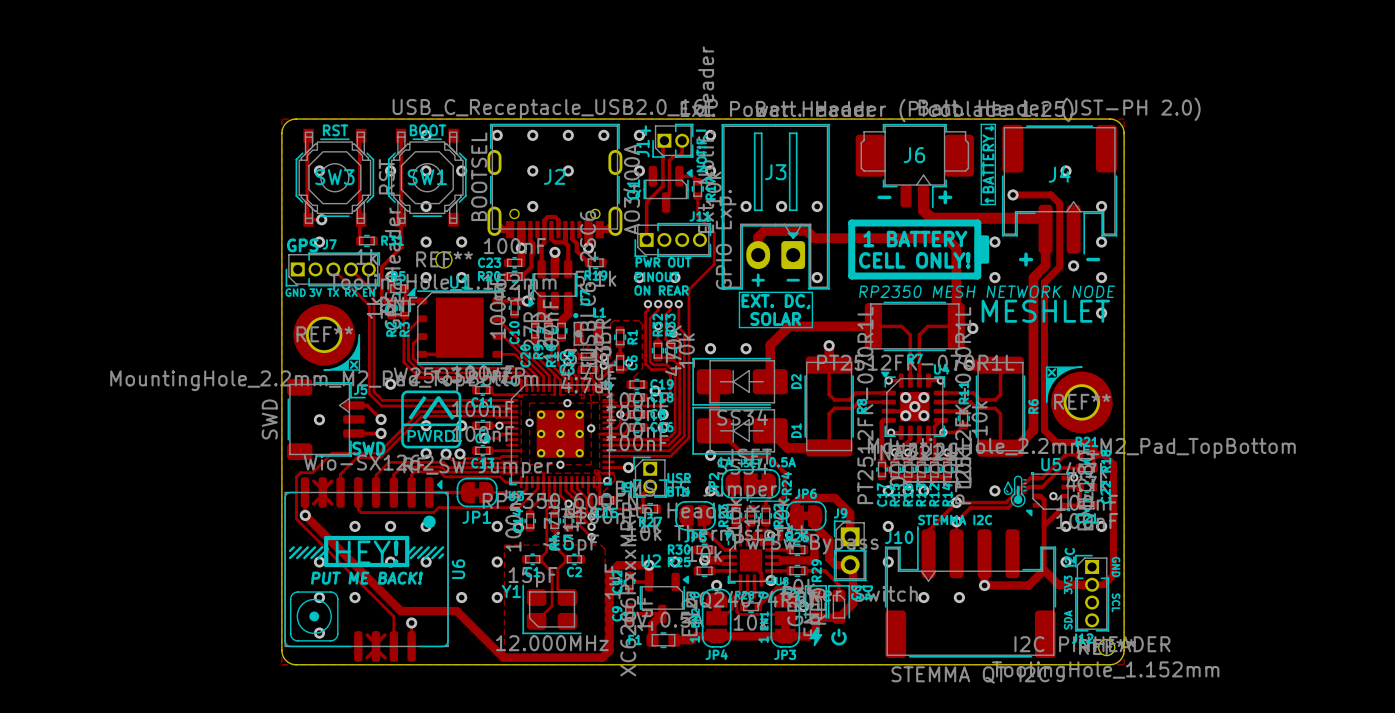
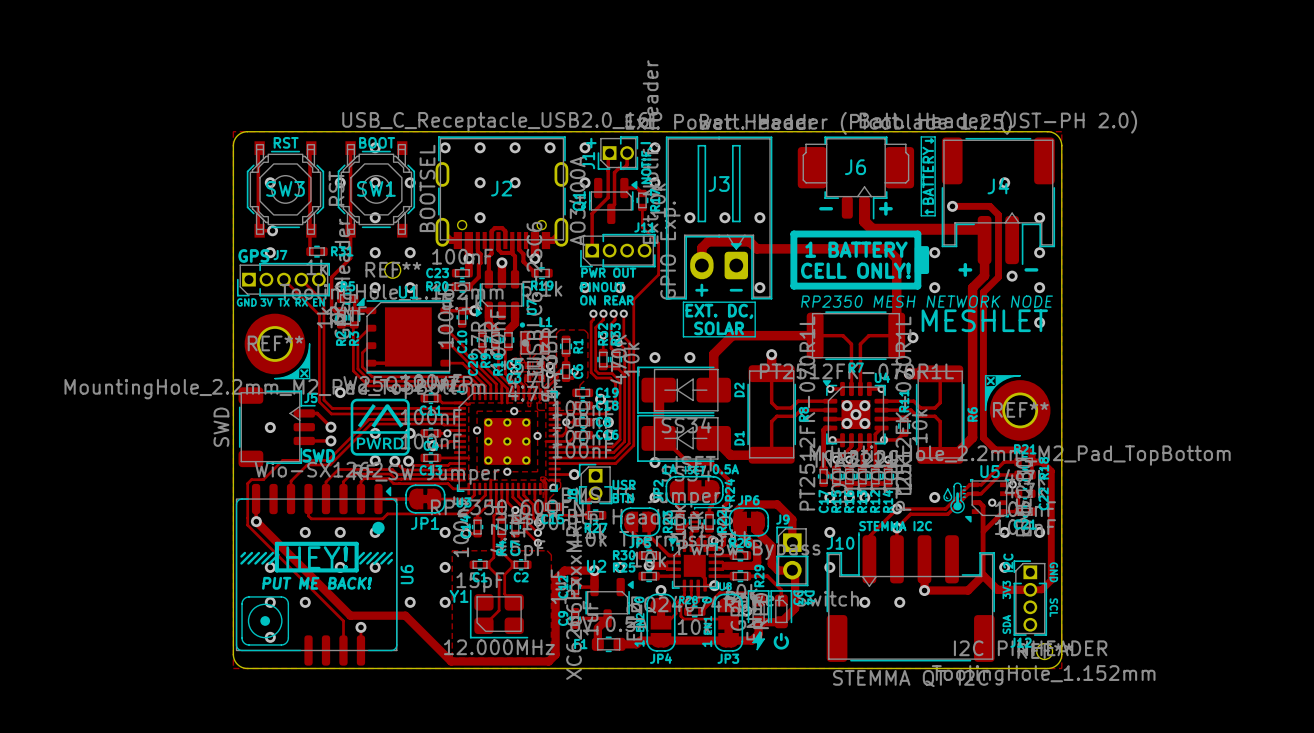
track: (313, 481) (322, 489) -> none
track: (331, 481) (323, 489) -> none
track: (322, 494) (313, 503) -> none
track: (322, 494) (331, 504) -> none
track: (367, 634) (376, 643) -> none
track: (384, 634) (376, 643) -> none
track: (376, 648) (367, 657) -> none
track: (376, 648) (385, 657) -> none

